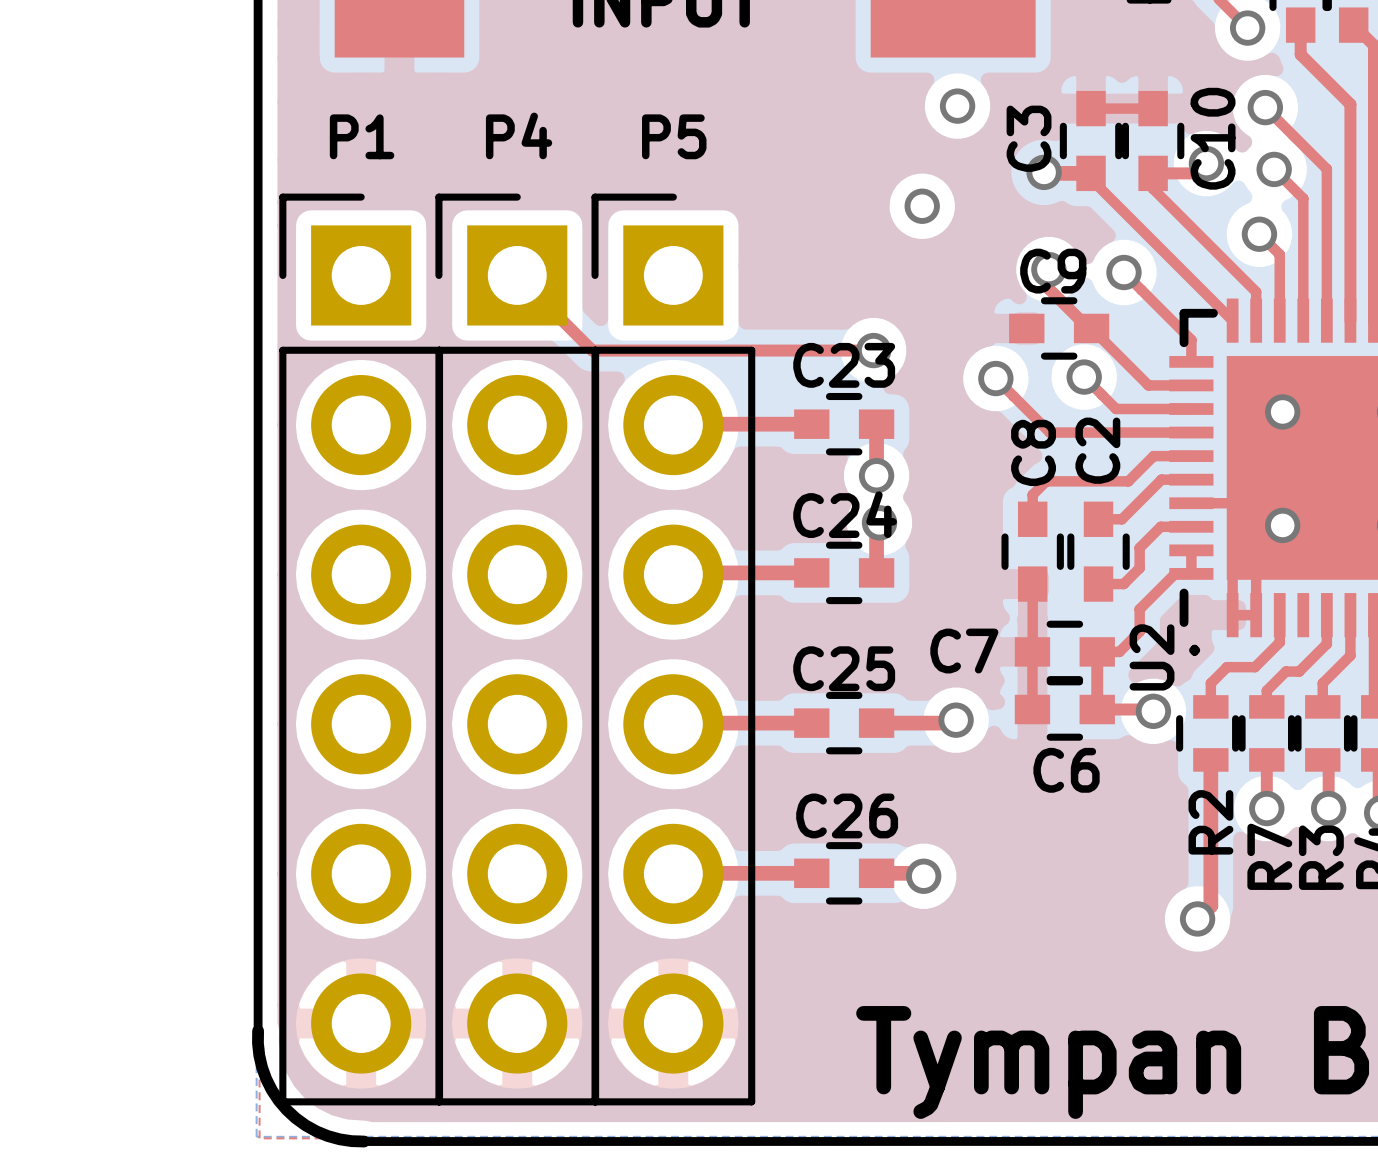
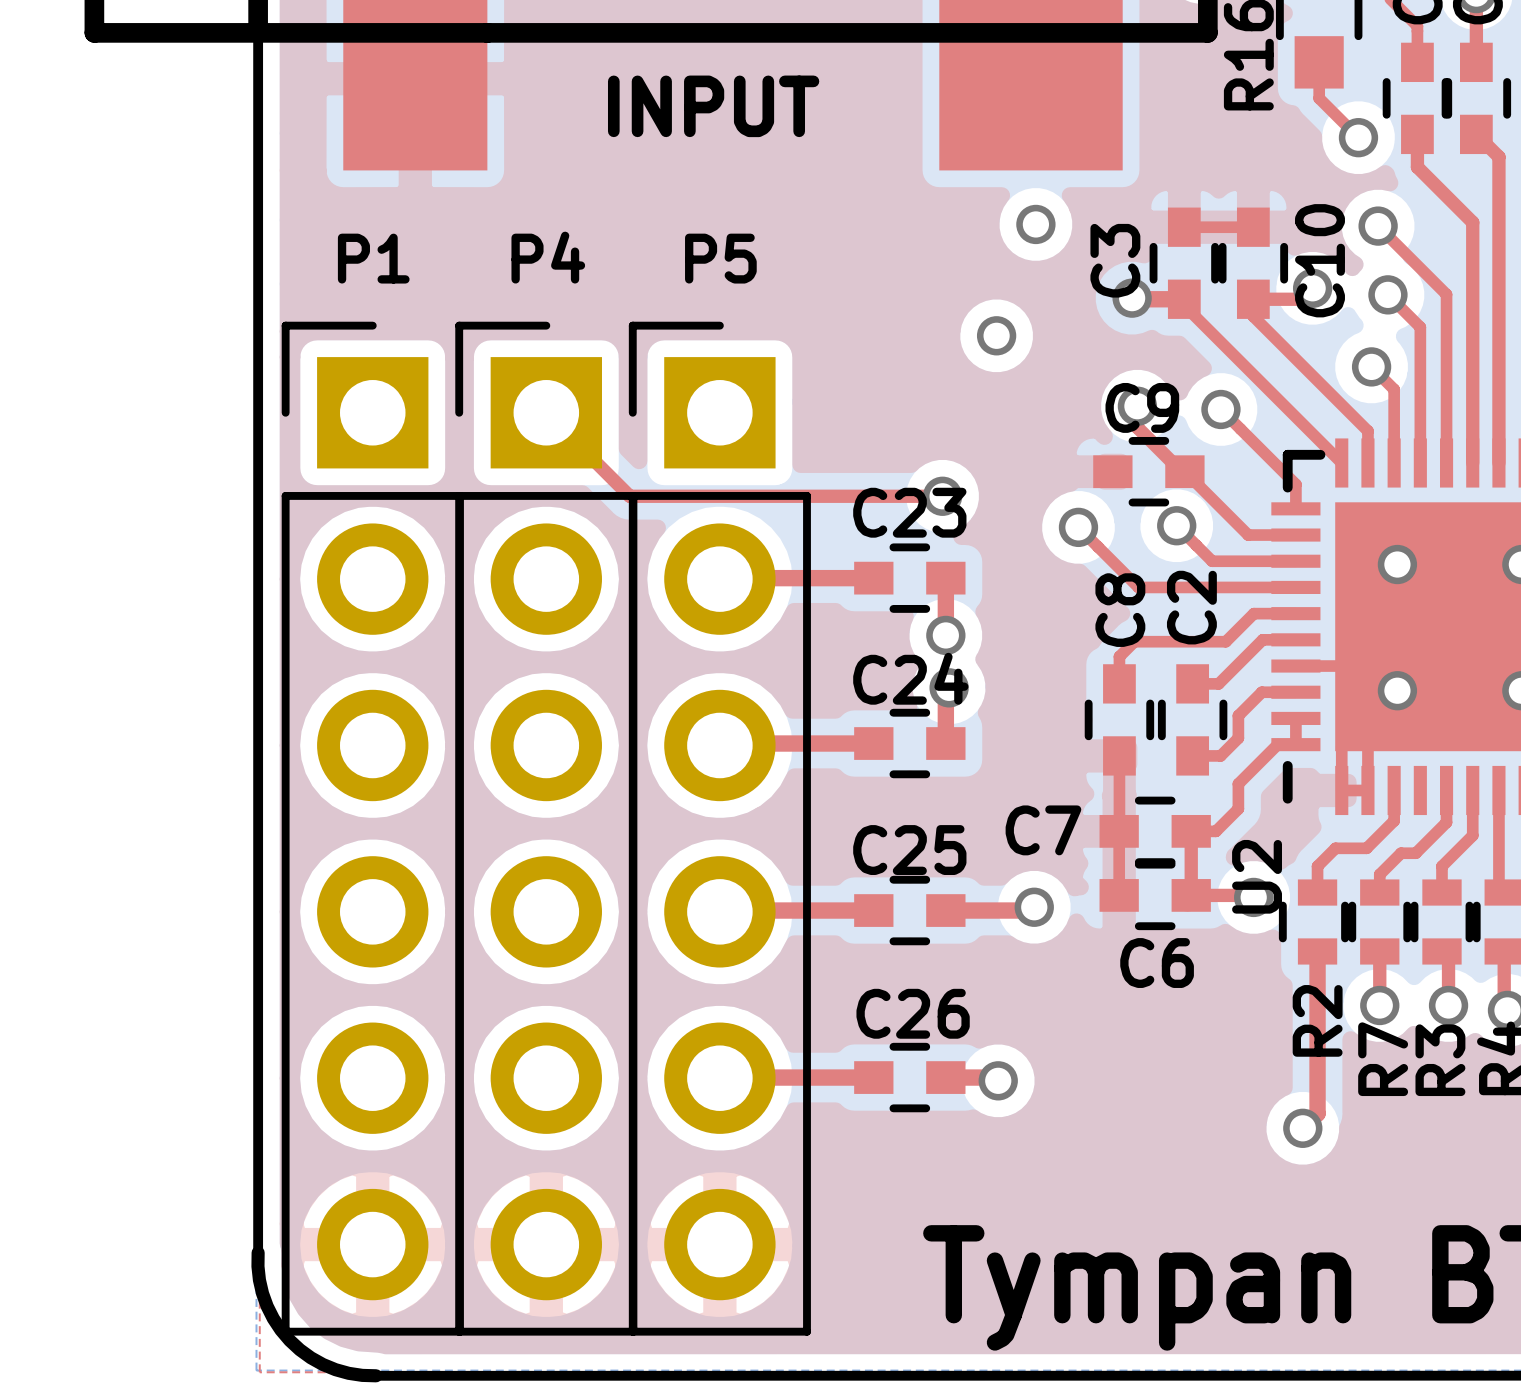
text: . (1194, 650) -> none
U2 name position: U2 (1152, 657) -> U2 (1257, 876)

